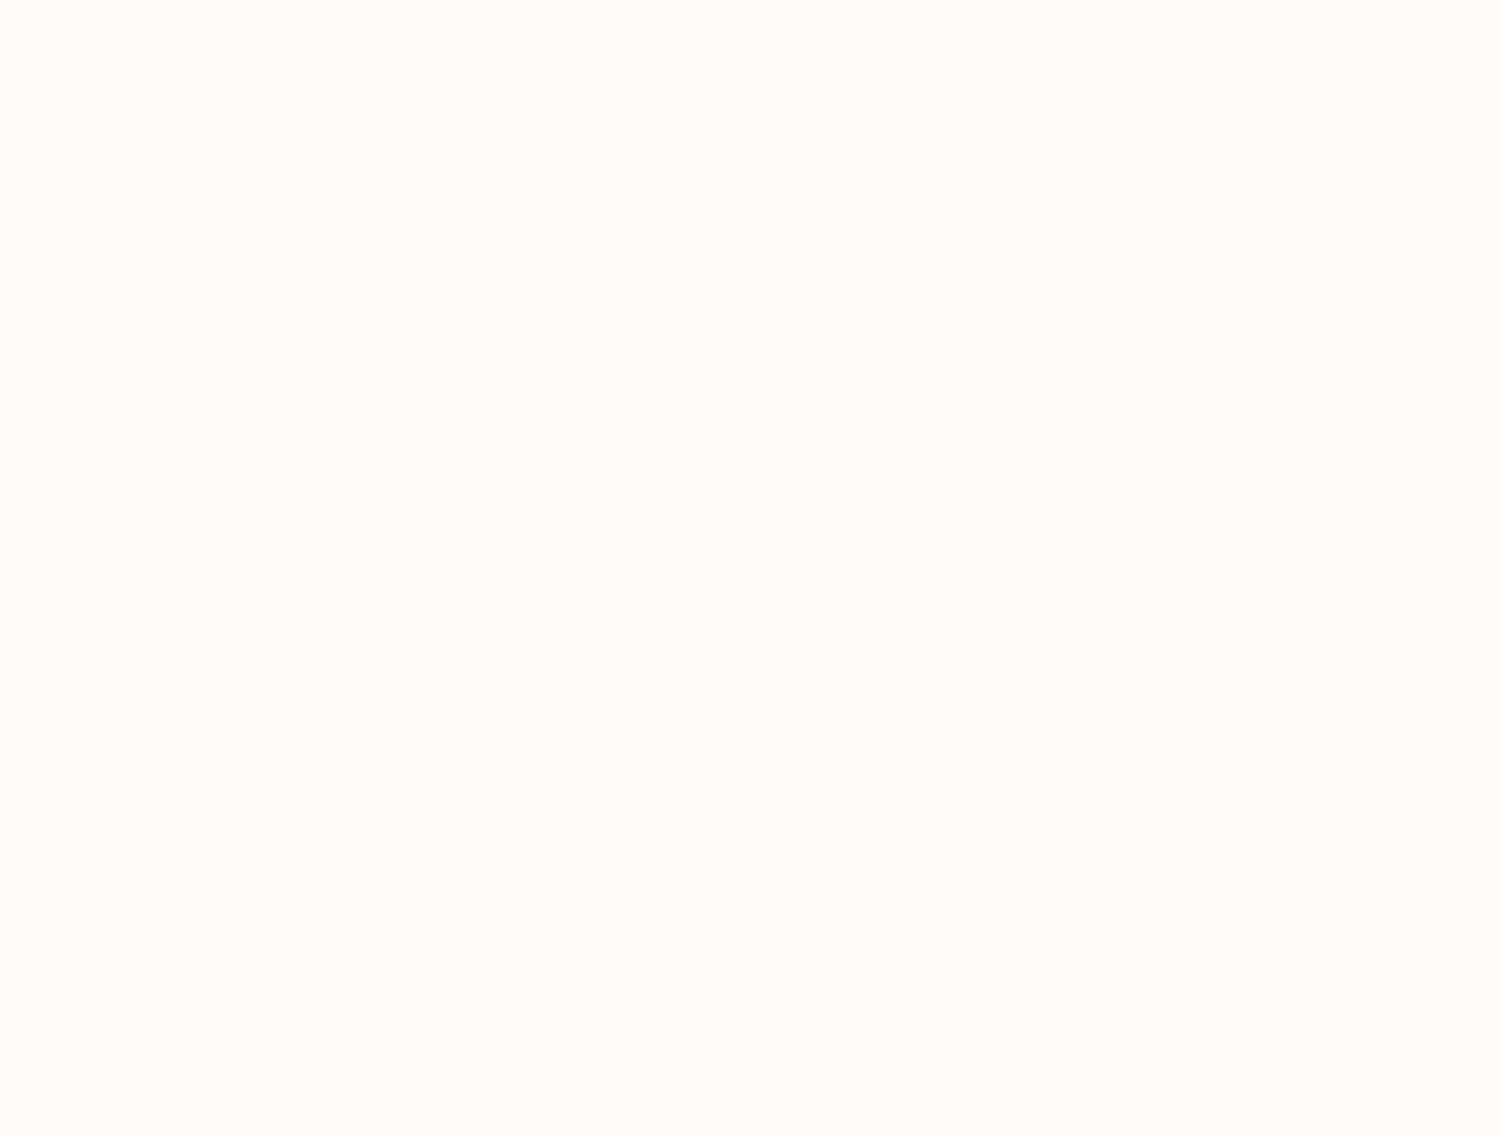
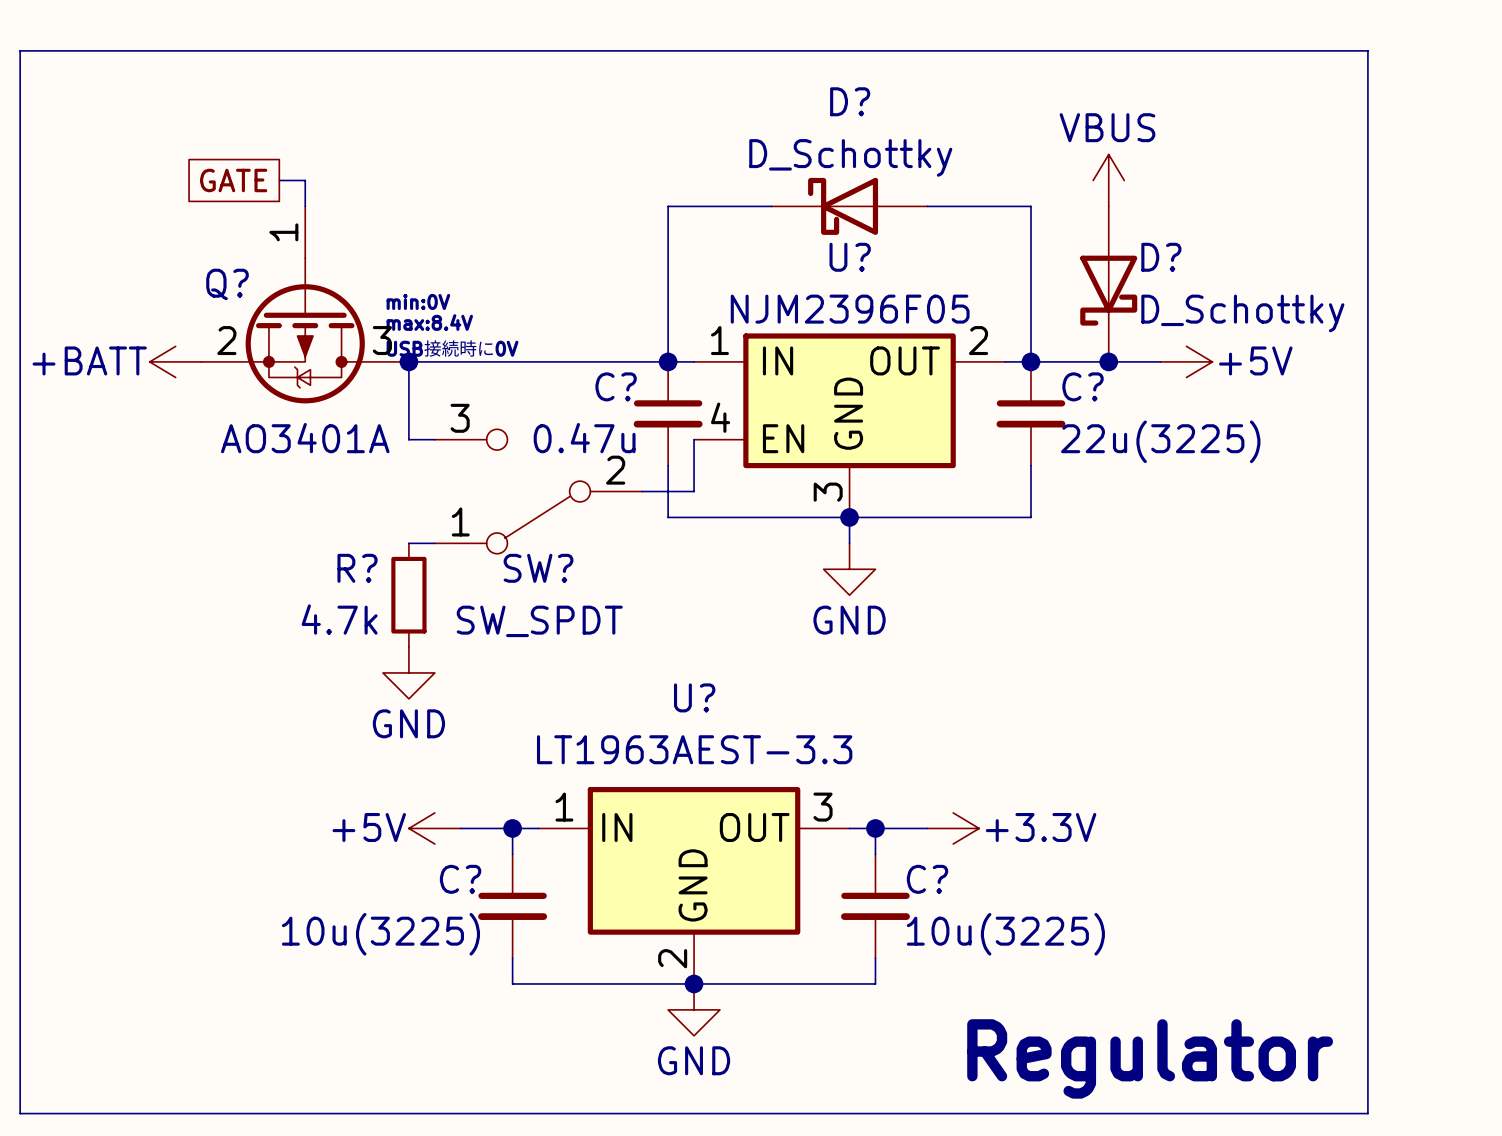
line: none -> (20, 50) (20, 1113) (1367, 1113) (1367, 50) (20, 50)
global label: none -> GATE (233, 180)
wire: none -> (279, 180) (305, 180) (305, 206)
power symbol: none -> VBUS (1108, 180)
wire: none -> (771, 206) (668, 206) (668, 361)
D?: none -> D_Schottky (849, 206)
wire: none -> (927, 206) (1030, 206) (1030, 361)
D?: none -> D_Schottky (1108, 284)
text: none -> min:0V (418, 301)
Q?: none -> AO3401A (305, 304)
text: none -> max:8.4V (429, 322)
text: none -> USB接続時に0V (452, 348)
power symbol: none -> +BATT (175, 361)
junction: none -> (408, 361)
junction: none -> (668, 361)
wire: none -> (694, 361) (408, 361) (408, 439) (434, 439)
wire: none -> (1005, 361) (1160, 361)
junction: none -> (1030, 361)
junction: none -> (1108, 361)
power symbol: none -> +5V (1186, 361)
C?: none -> 0.47u (668, 413)
C?: none -> 22u(3225) (1030, 413)
U?: none -> NJM2396F05 (849, 425)
wire: none -> (694, 439) (694, 491) (642, 491)
wire: none -> (668, 465) (668, 517) (1030, 517) (1030, 465)
SW?: none -> SW_SPDT (538, 491)
wire: none -> (849, 517) (849, 543)
junction: none -> (849, 517)
wire: none -> (408, 543) (434, 543)
power symbol: none -> GND (849, 569)
R?: none -> 4.7k (408, 595)
power symbol: none -> GND (408, 672)
power symbol: none -> +5V (434, 828)
wire: none -> (460, 828) (538, 828)
wire: none -> (512, 828) (512, 854)
junction: none -> (512, 828)
wire: none -> (849, 828) (927, 828)
wire: none -> (875, 828) (875, 854)
junction: none -> (875, 828)
power symbol: none -> +3.3V (953, 828)
U?: none -> LT1963AEST-3.3 (694, 885)
C?: none -> 10u(3225) (512, 906)
C?: none -> 10u(3225) (875, 906)
wire: none -> (512, 958) (512, 983) (875, 983) (875, 958)
junction: none -> (694, 983)
power symbol: none -> GND (694, 1009)
text: none -> Regulator (1150, 1058)

